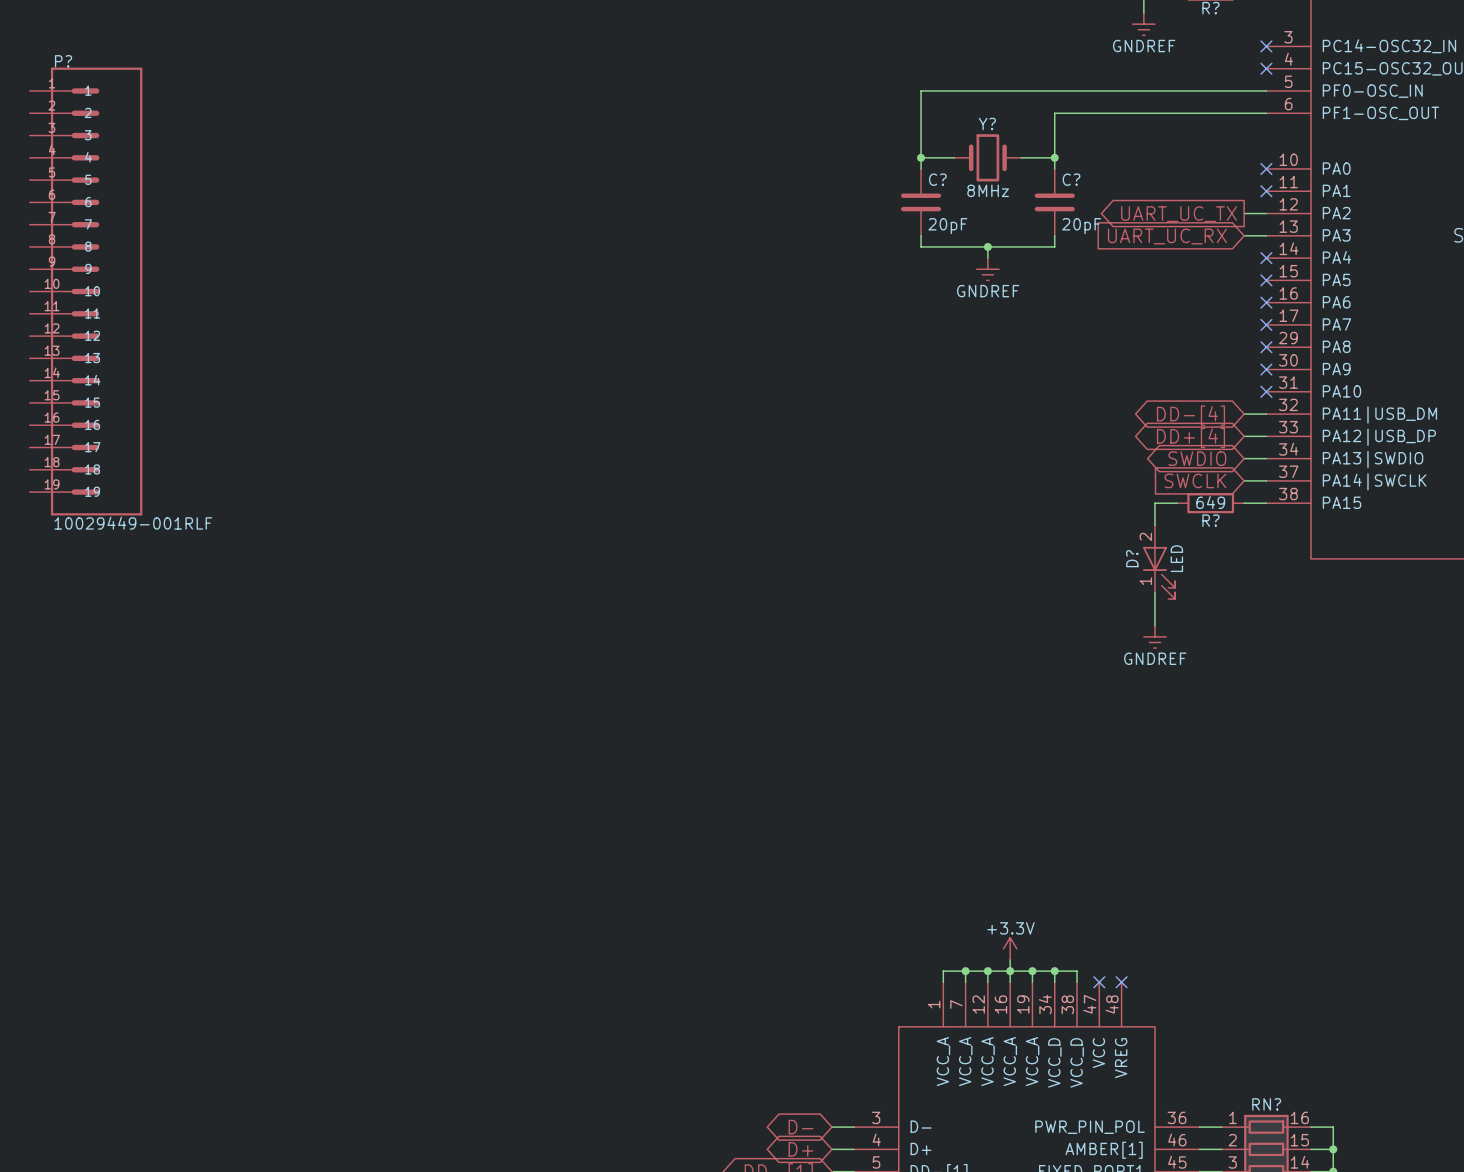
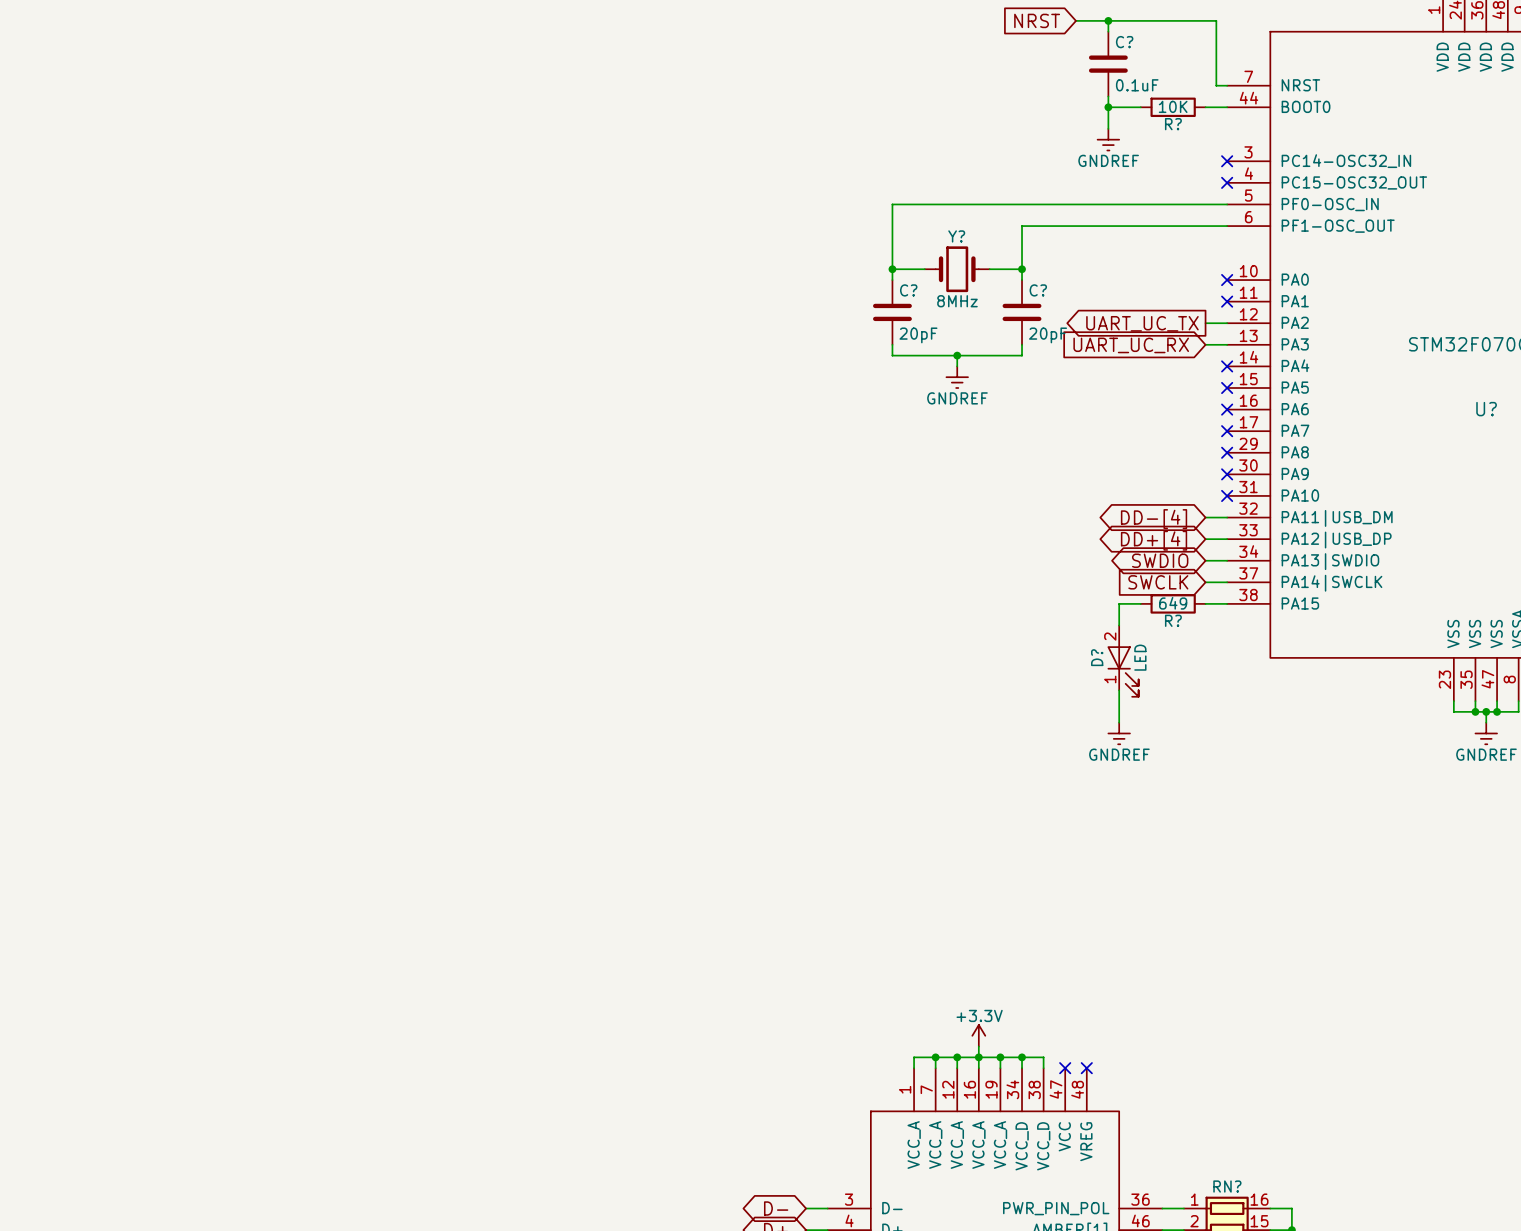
P?: 10029449-001RLF (86, 291) -> none

